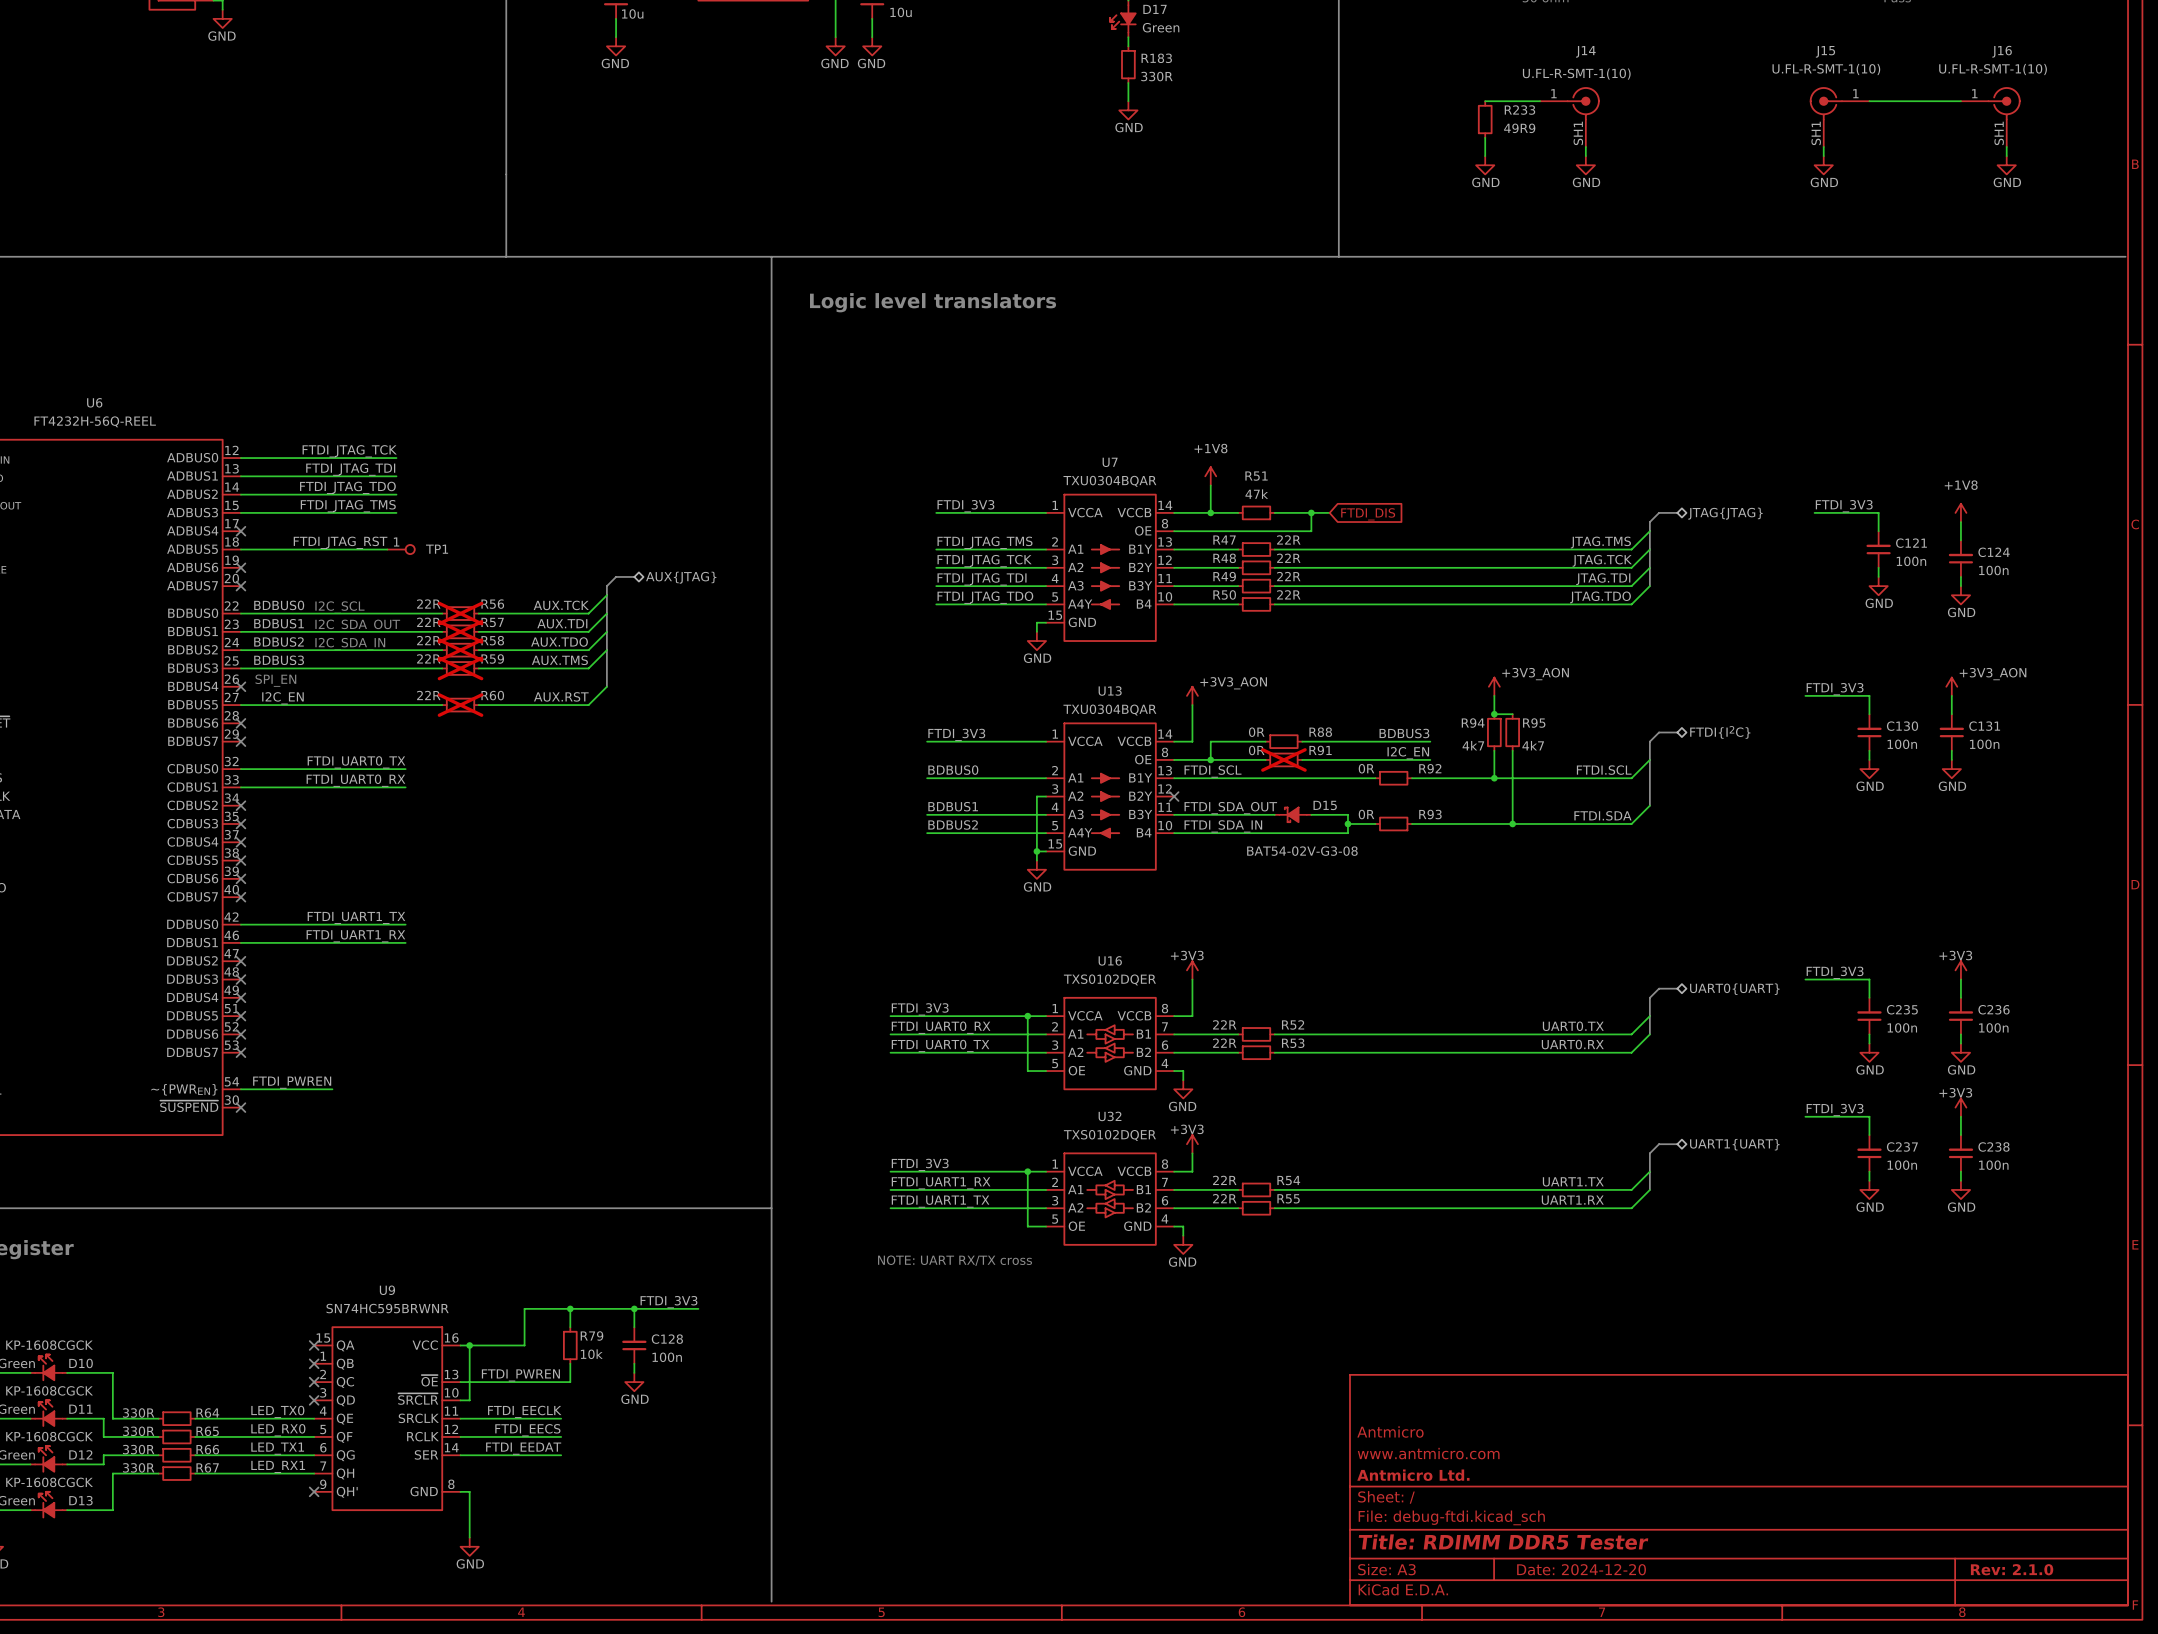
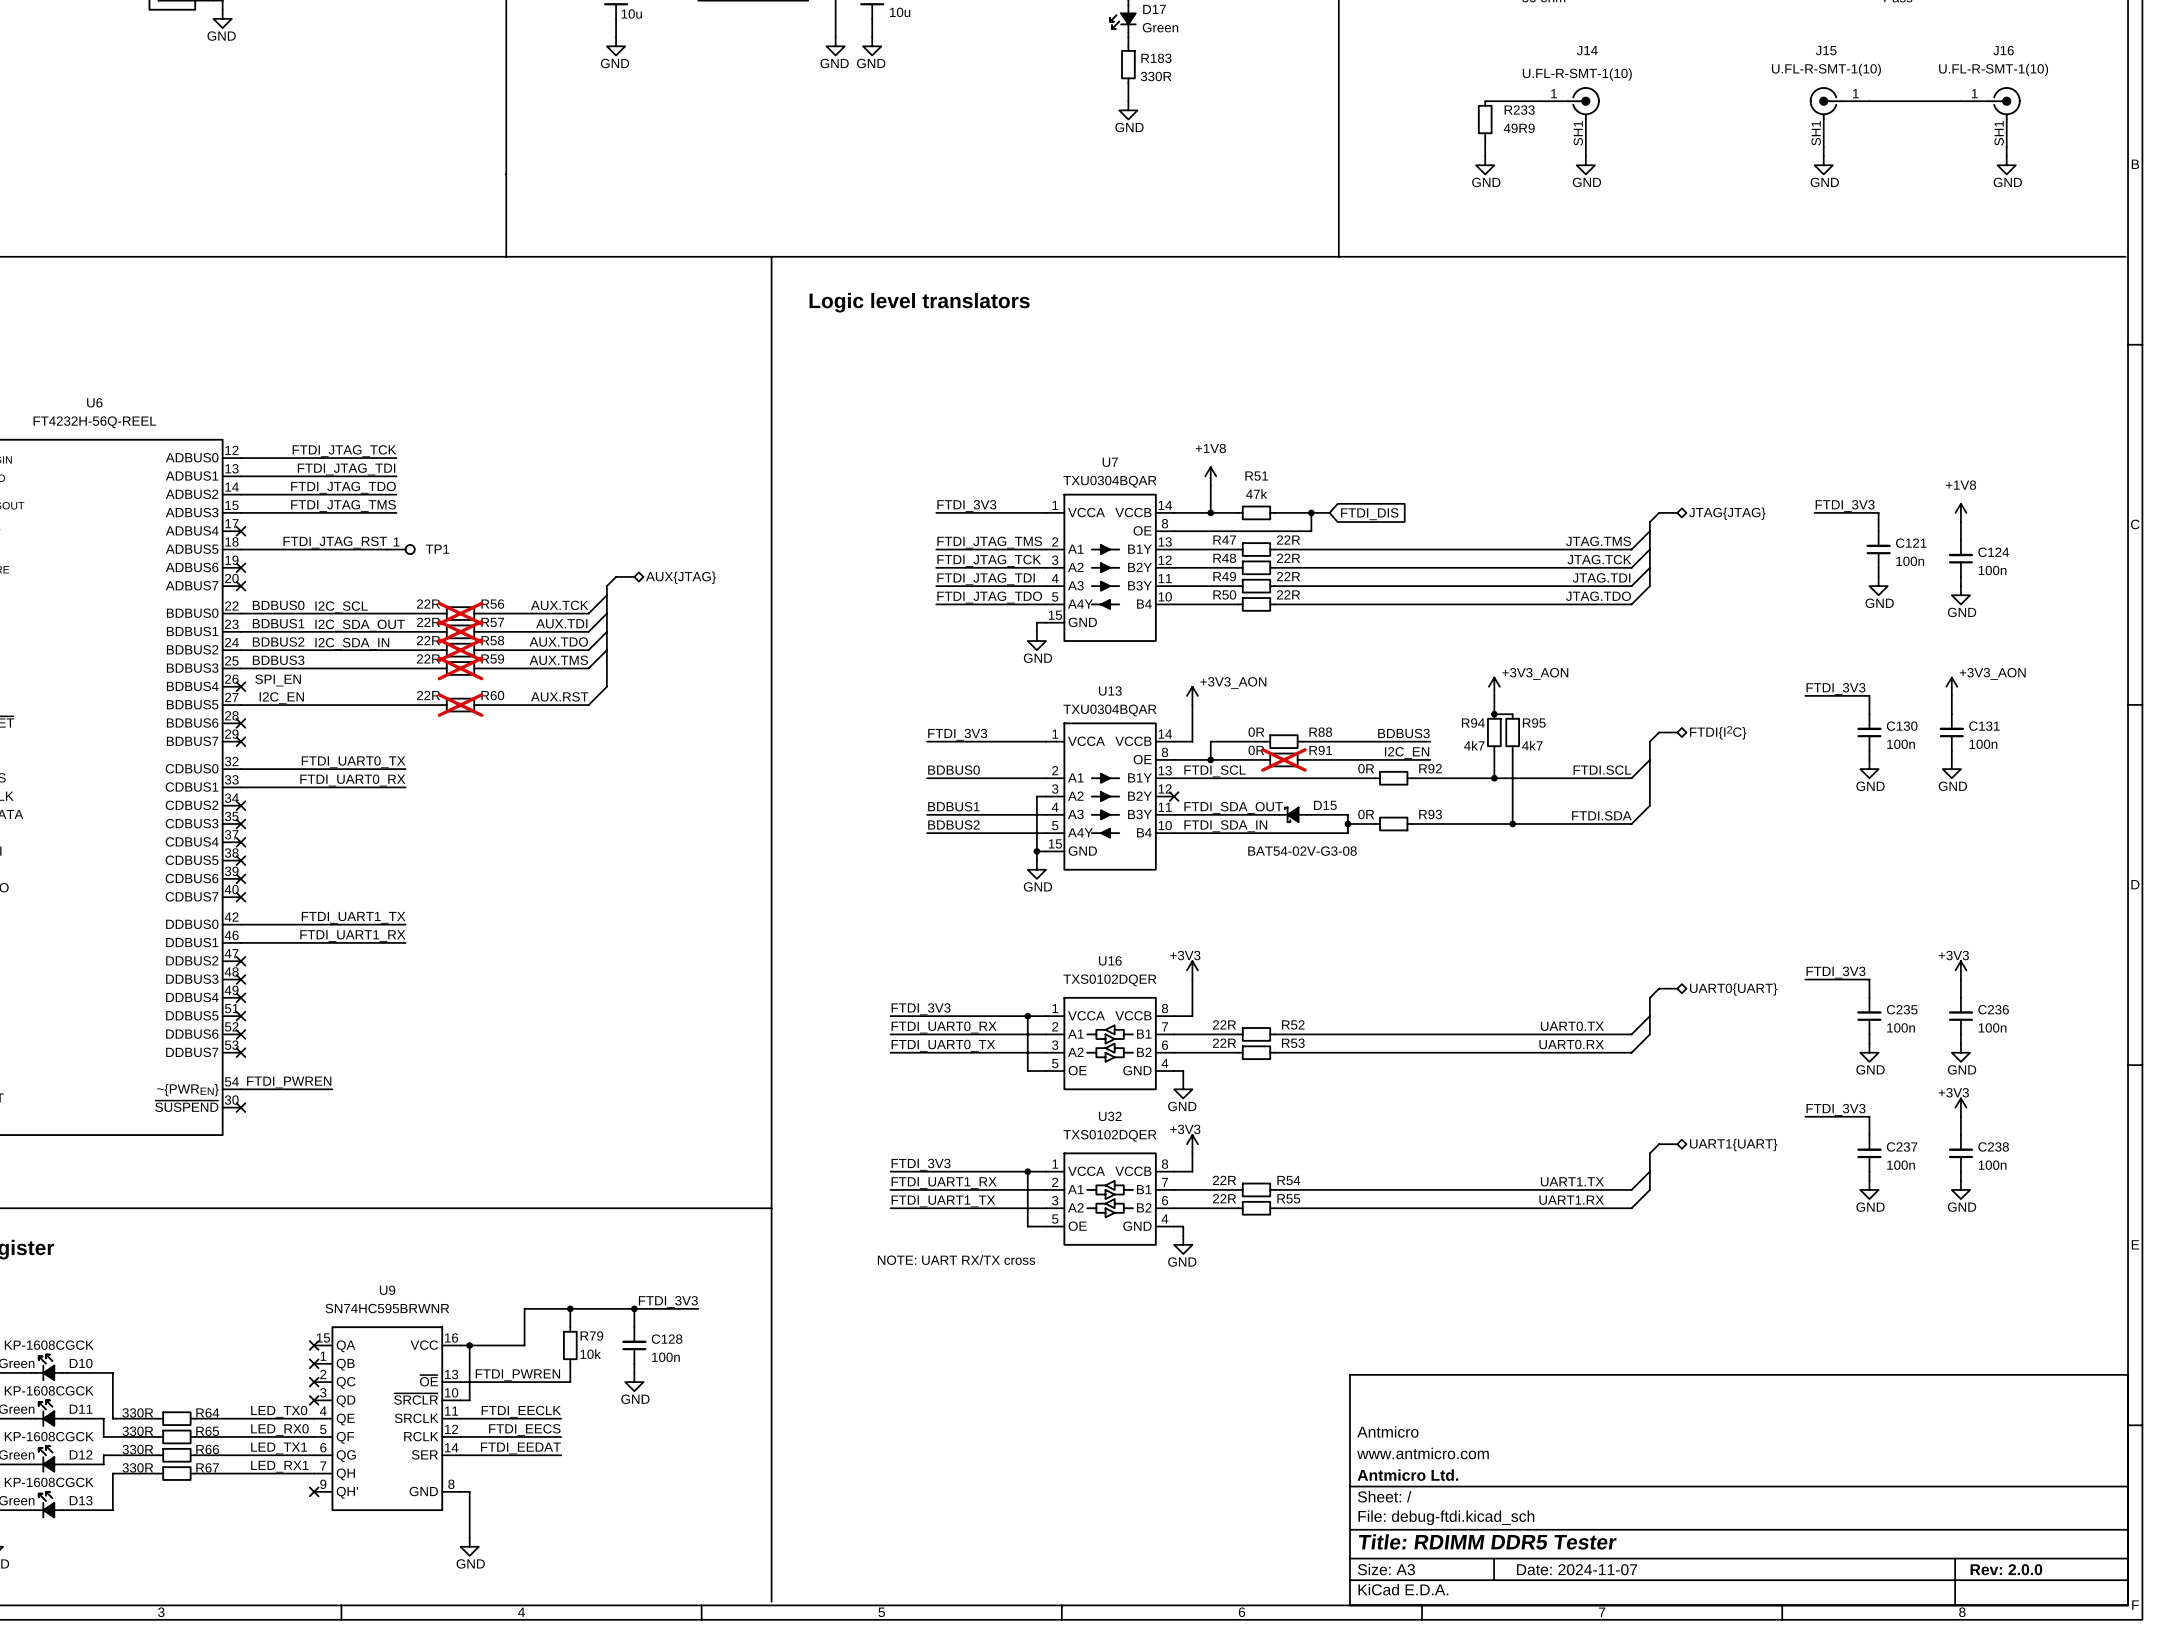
title block: Date: 2024-12-20 (1581, 1569) -> Date: 2024-11-07 (1577, 1569)
title block: Rev: 2.1.0 (2012, 1569) -> Rev: 2.0.0 (2006, 1569)

